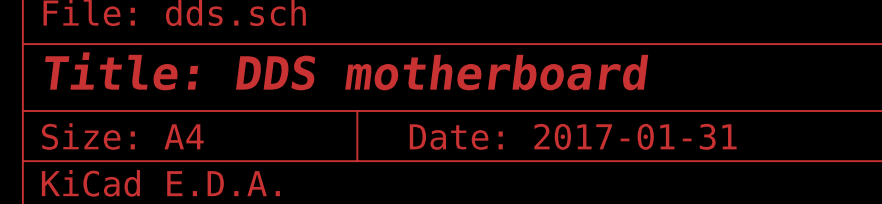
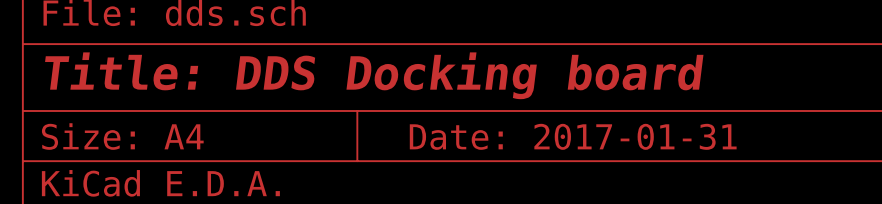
title block: Title: DDS motherboard (346, 71) -> Title: DDS Docking board (374, 75)

